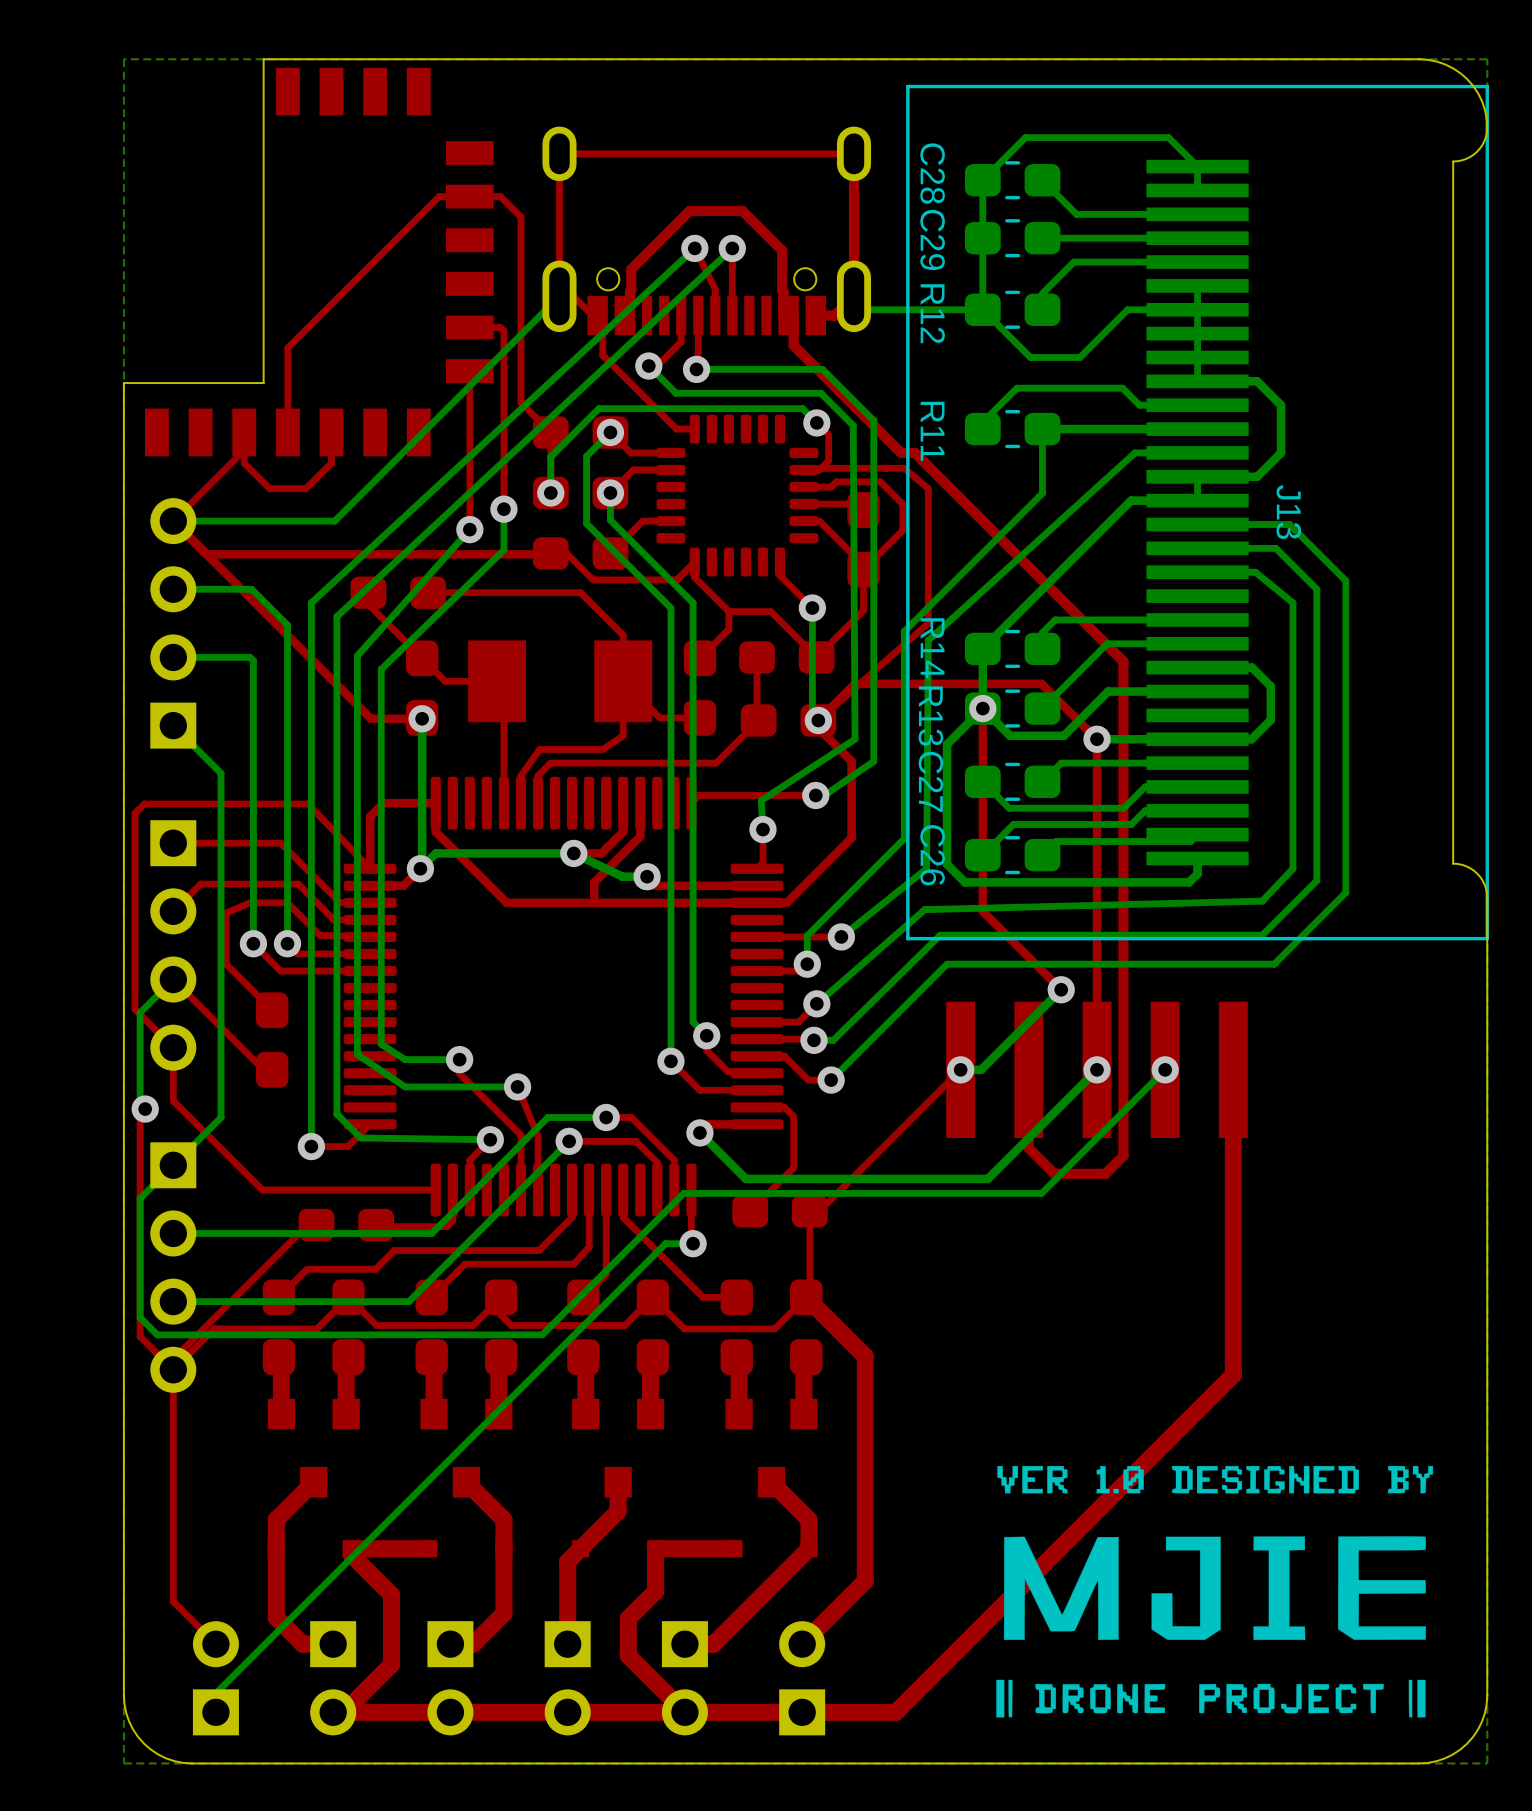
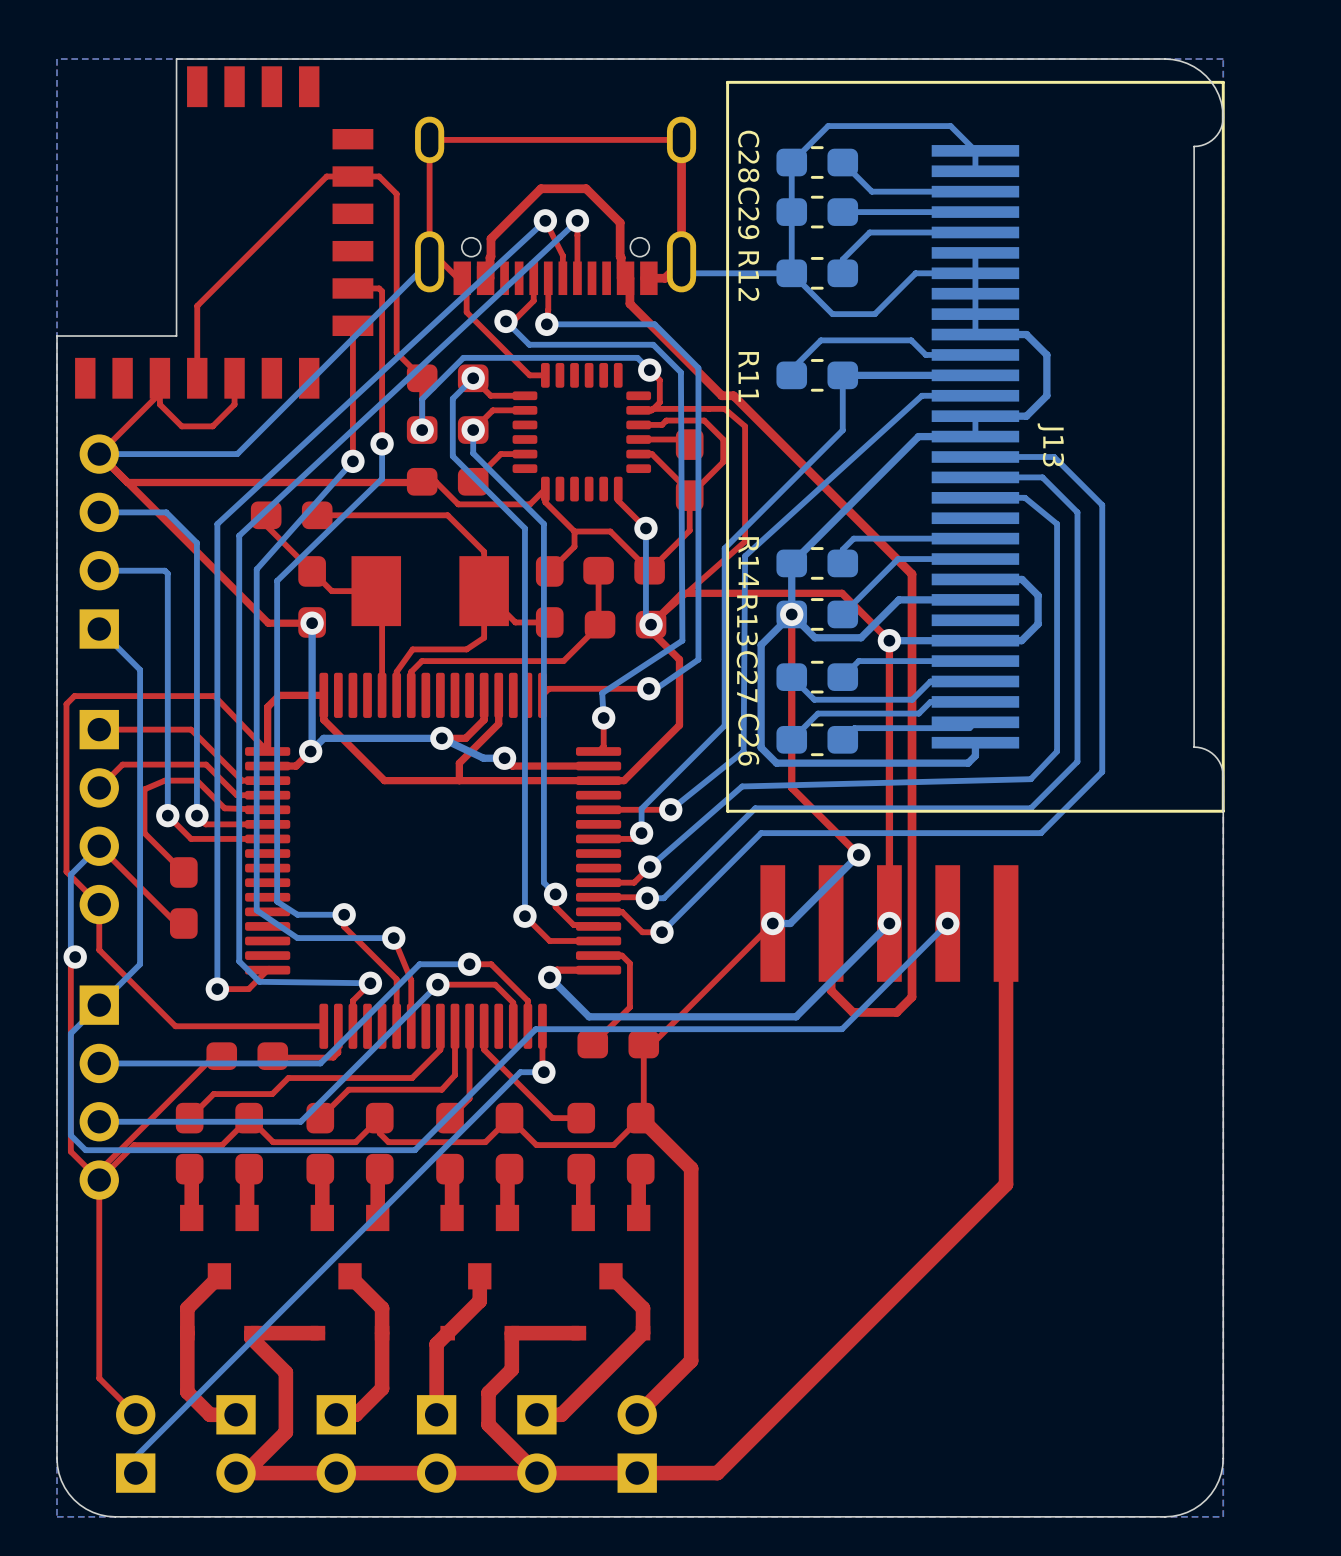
drawing: [996, 1465, 1434, 1718] -> none

